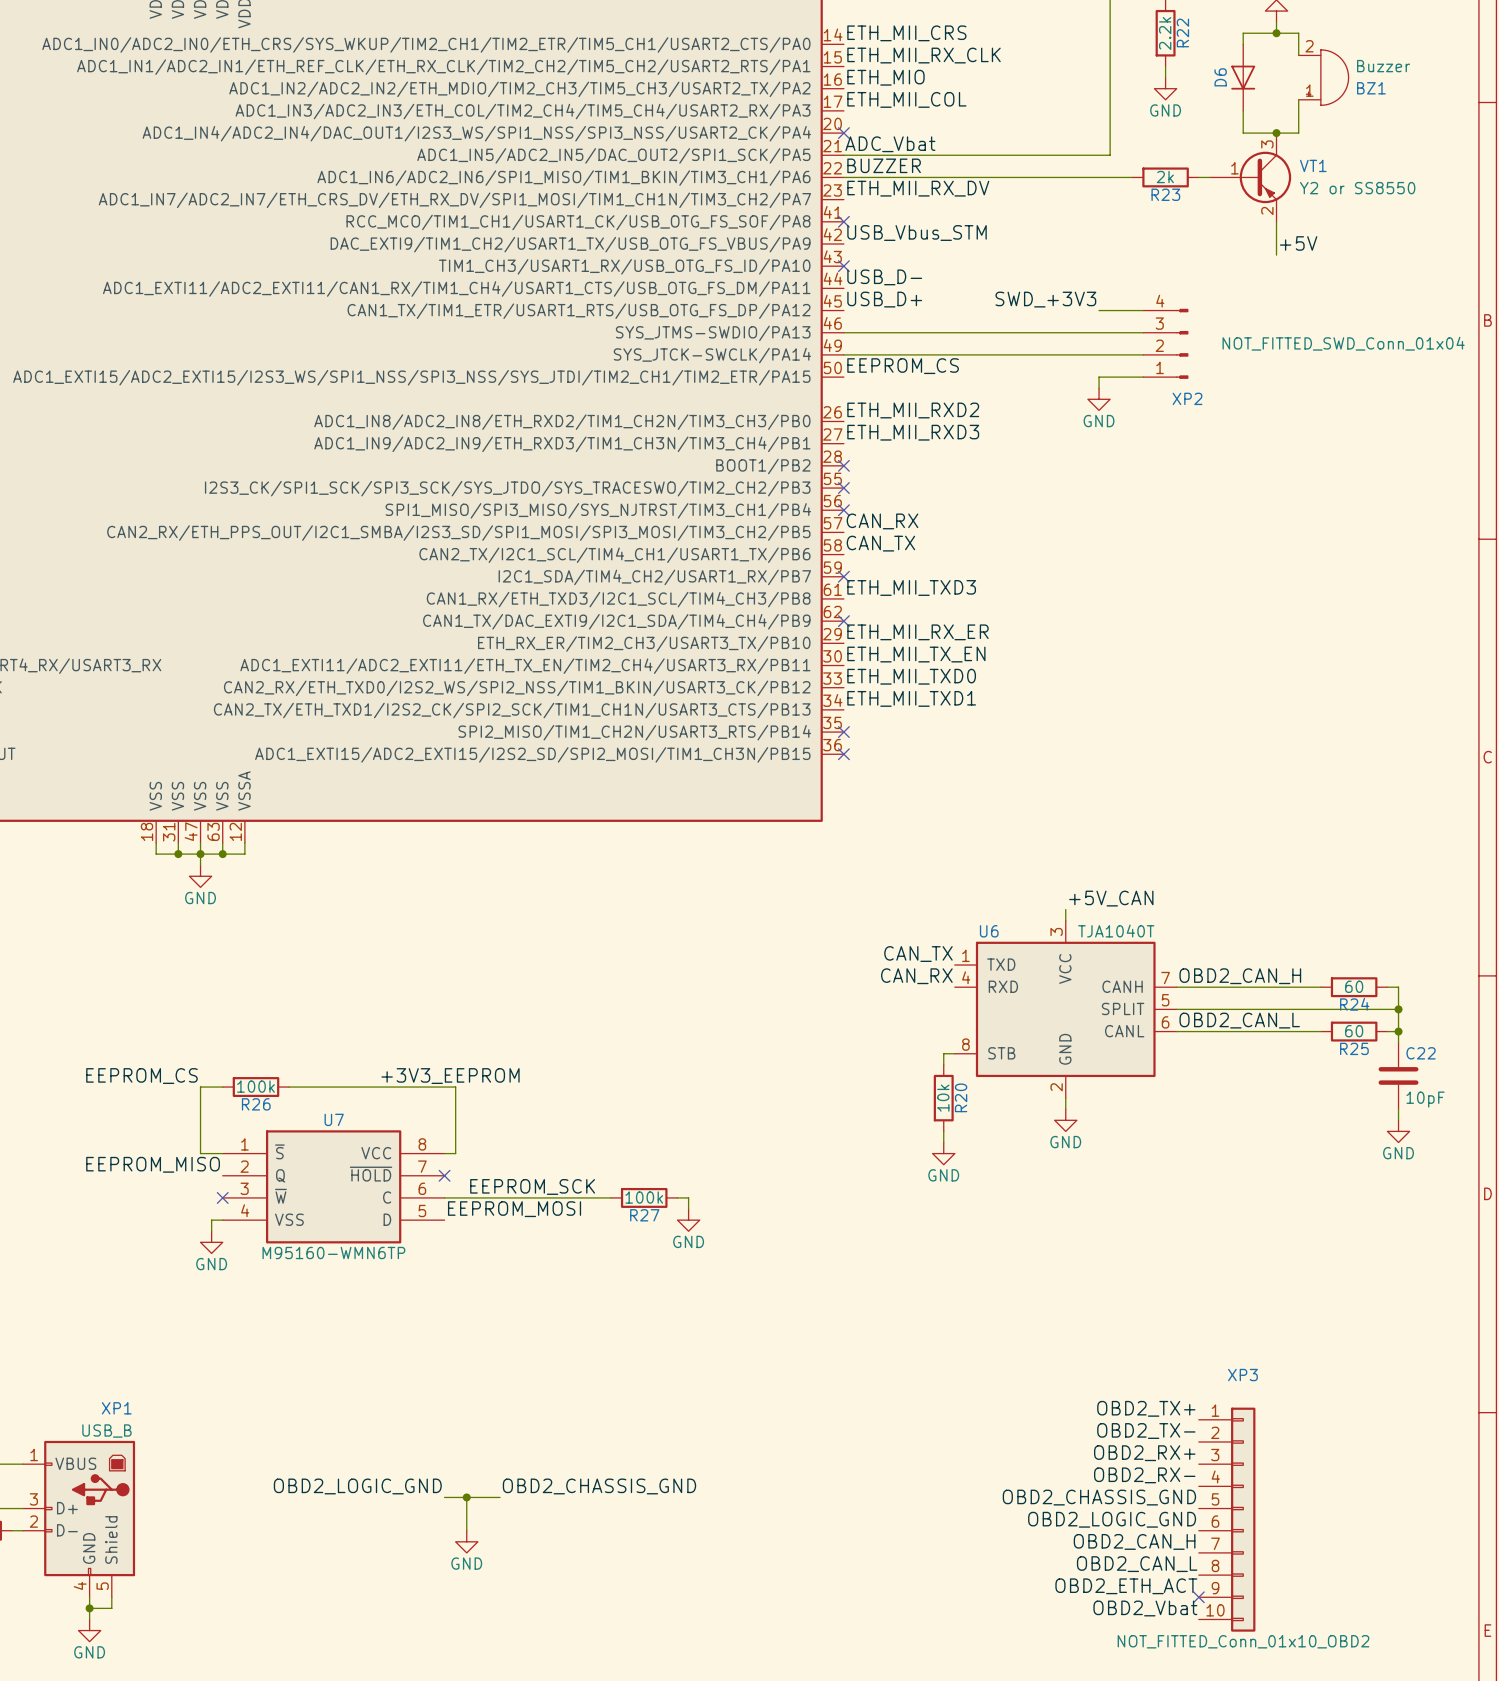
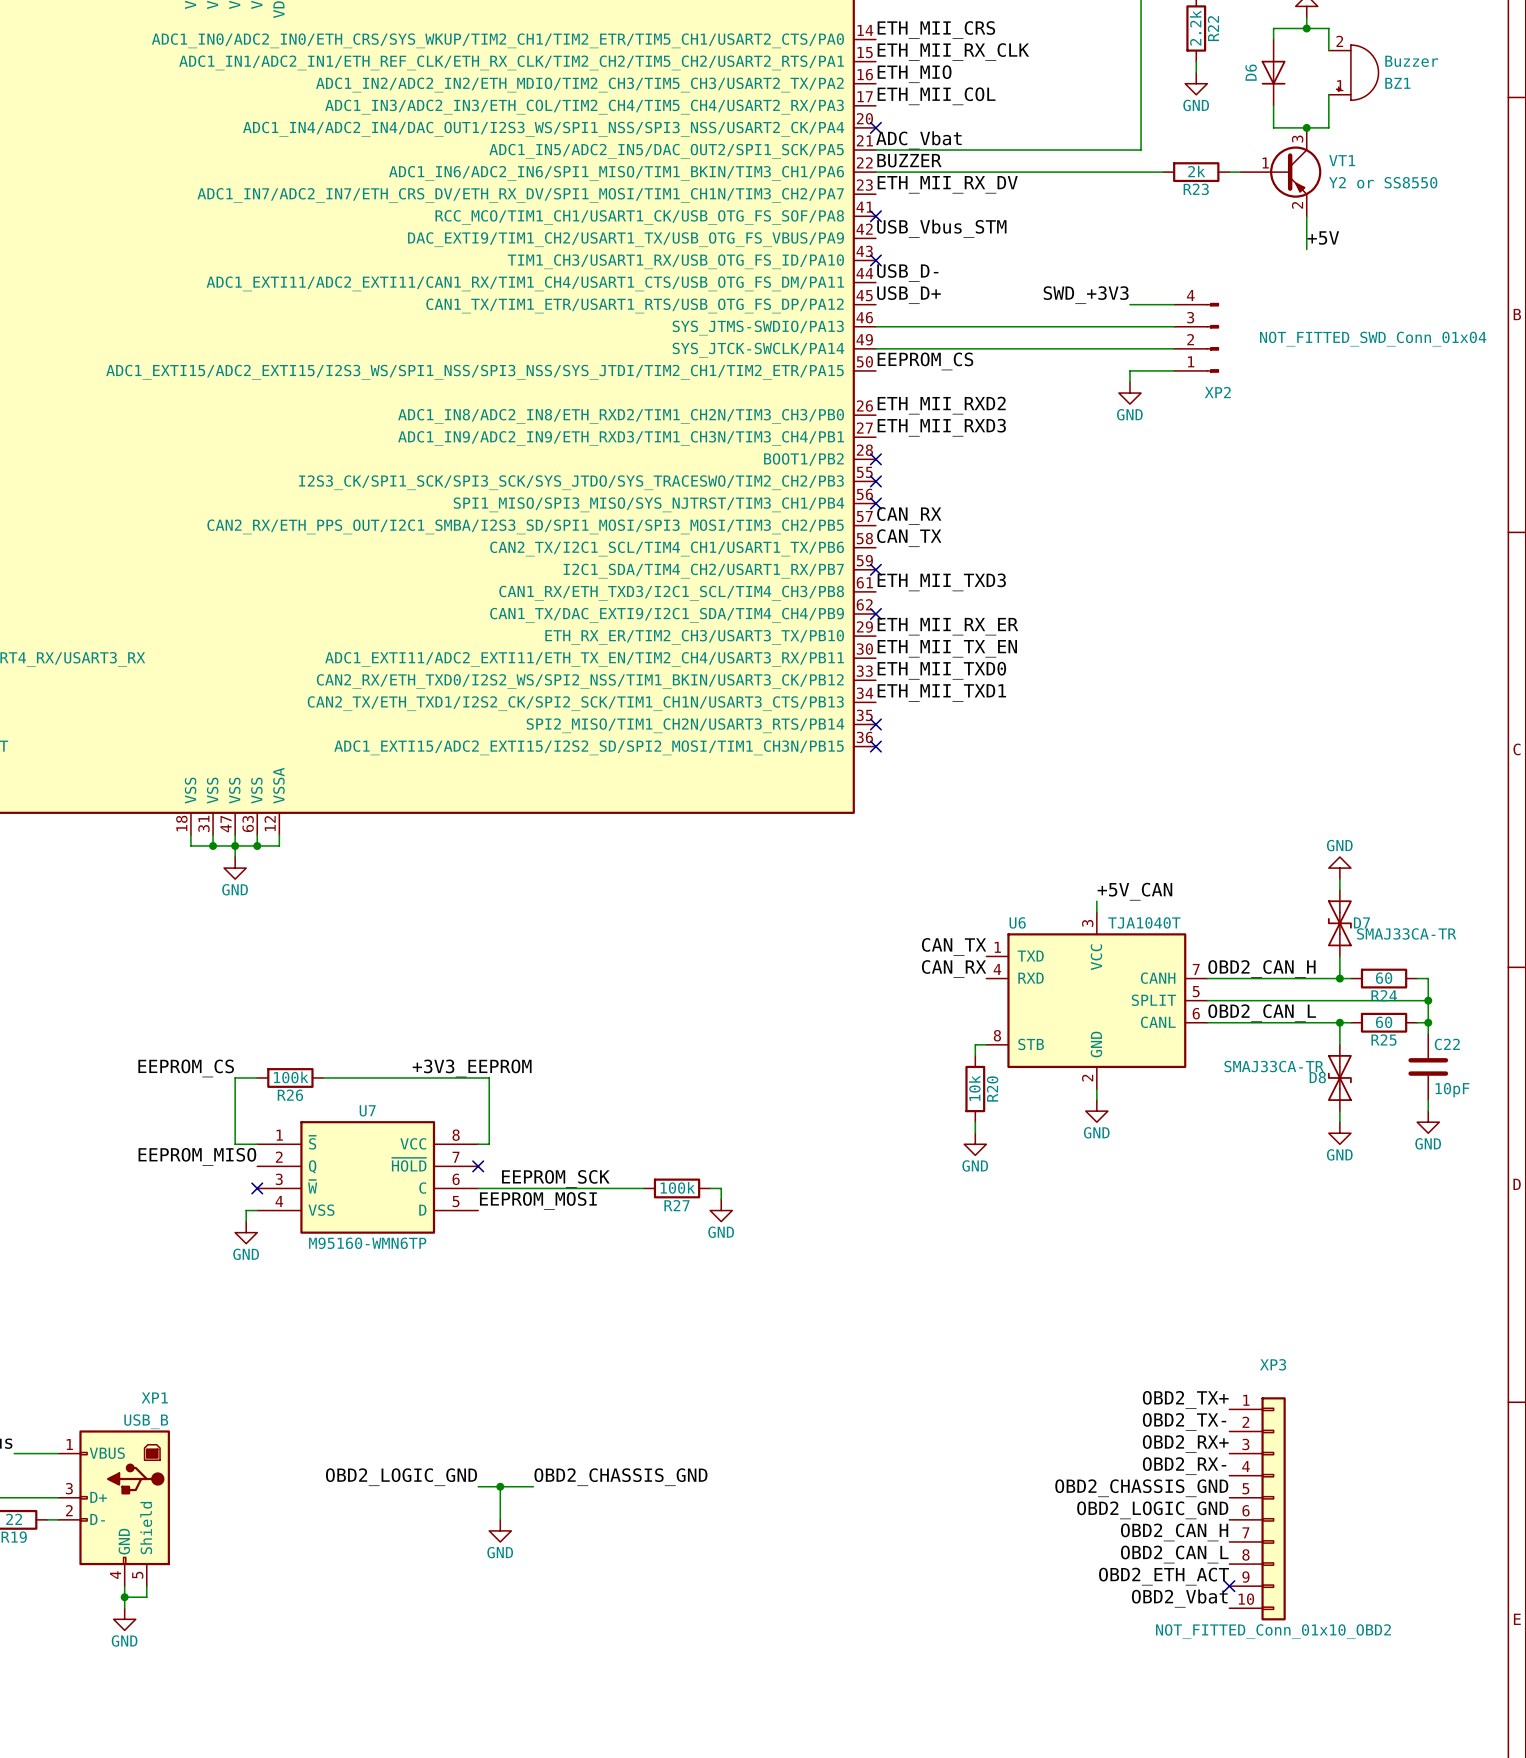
power symbol: none -> GND (1339, 868)
wire: none -> (1339, 879) (1339, 890)
D7: none -> SMAJ33CA-TR (1339, 923)
wire: none -> (1339, 956) (1339, 978)
junction: none -> (1339, 978)
wire: none -> (1339, 1022) (1339, 1044)
junction: none -> (1339, 1022)
D8: none -> SMAJ33CA-TR (1339, 1077)
wire: none -> (1339, 1111) (1339, 1122)
power symbol: none -> GND (1339, 1133)

